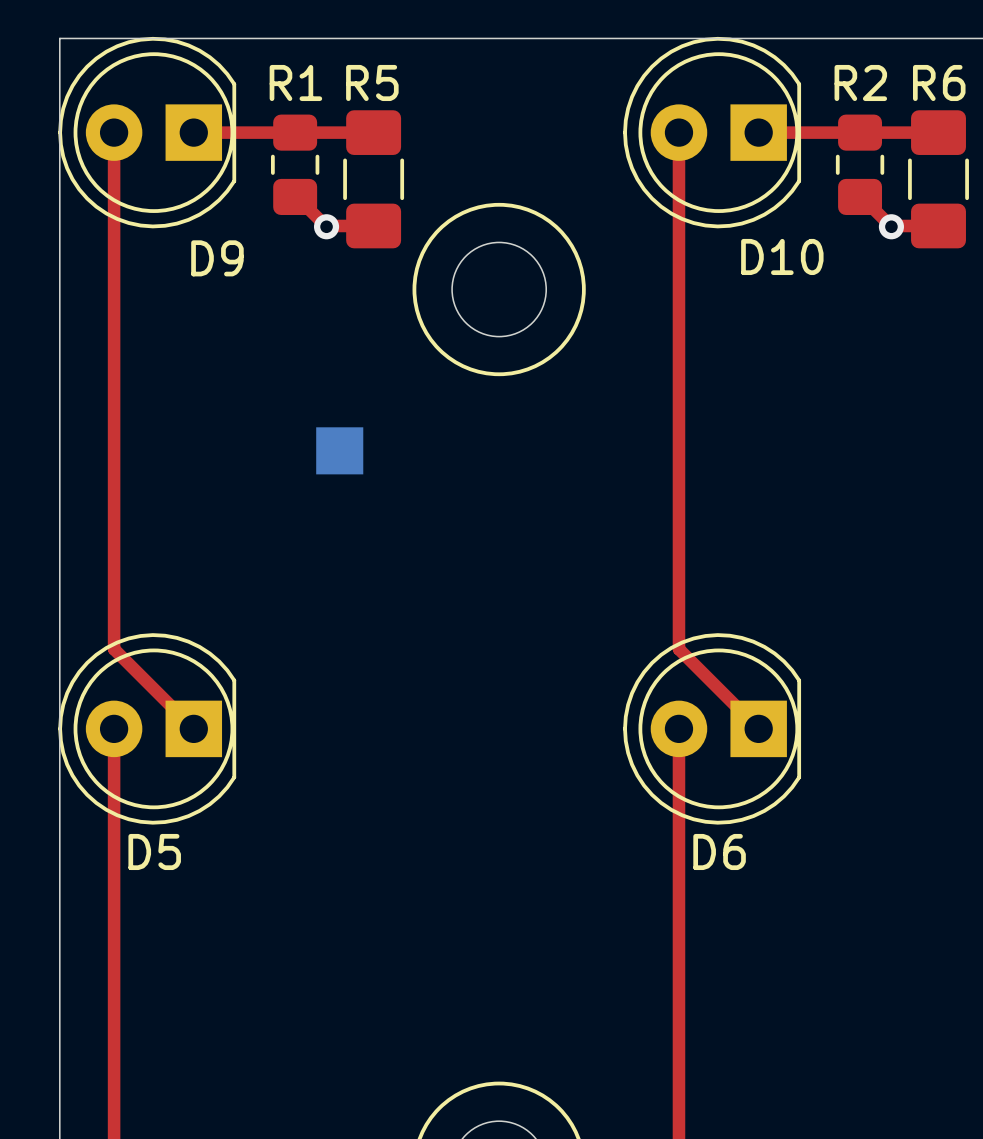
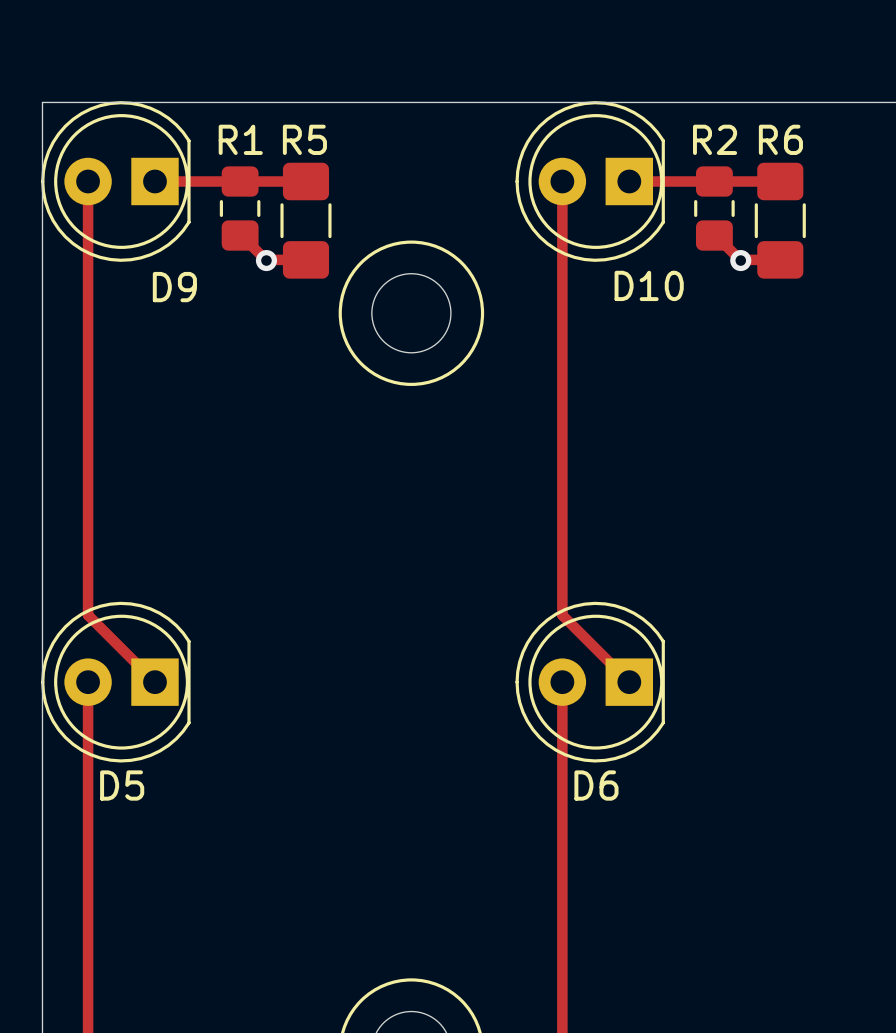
part: (339, 450) -> none

